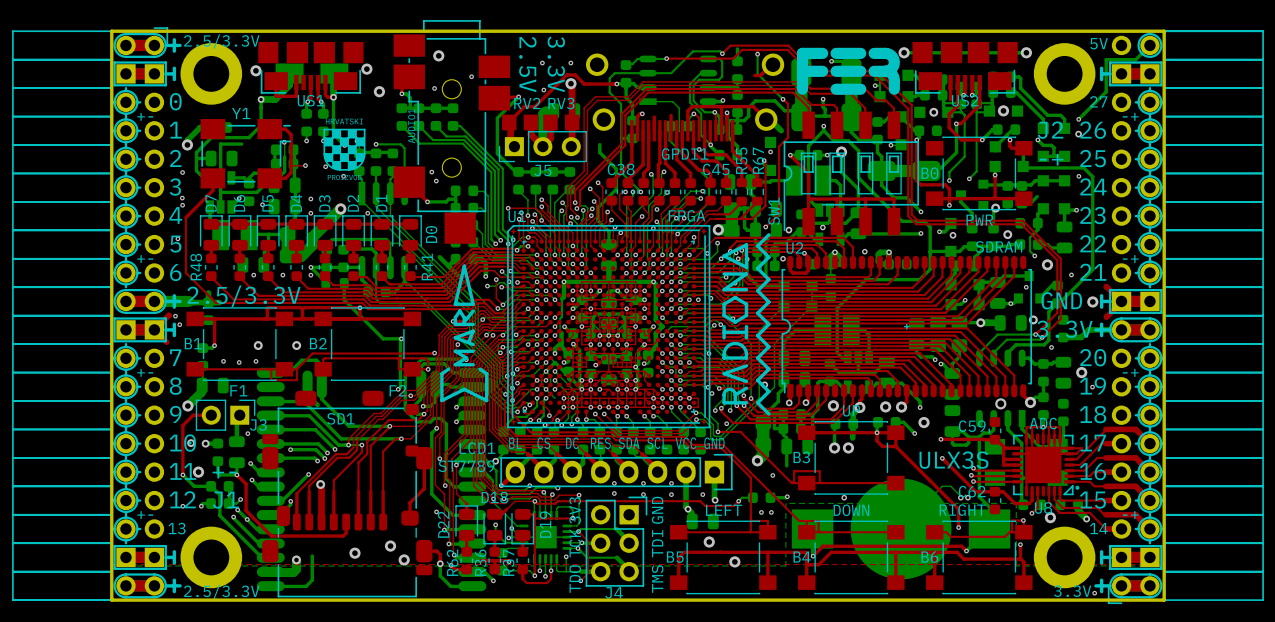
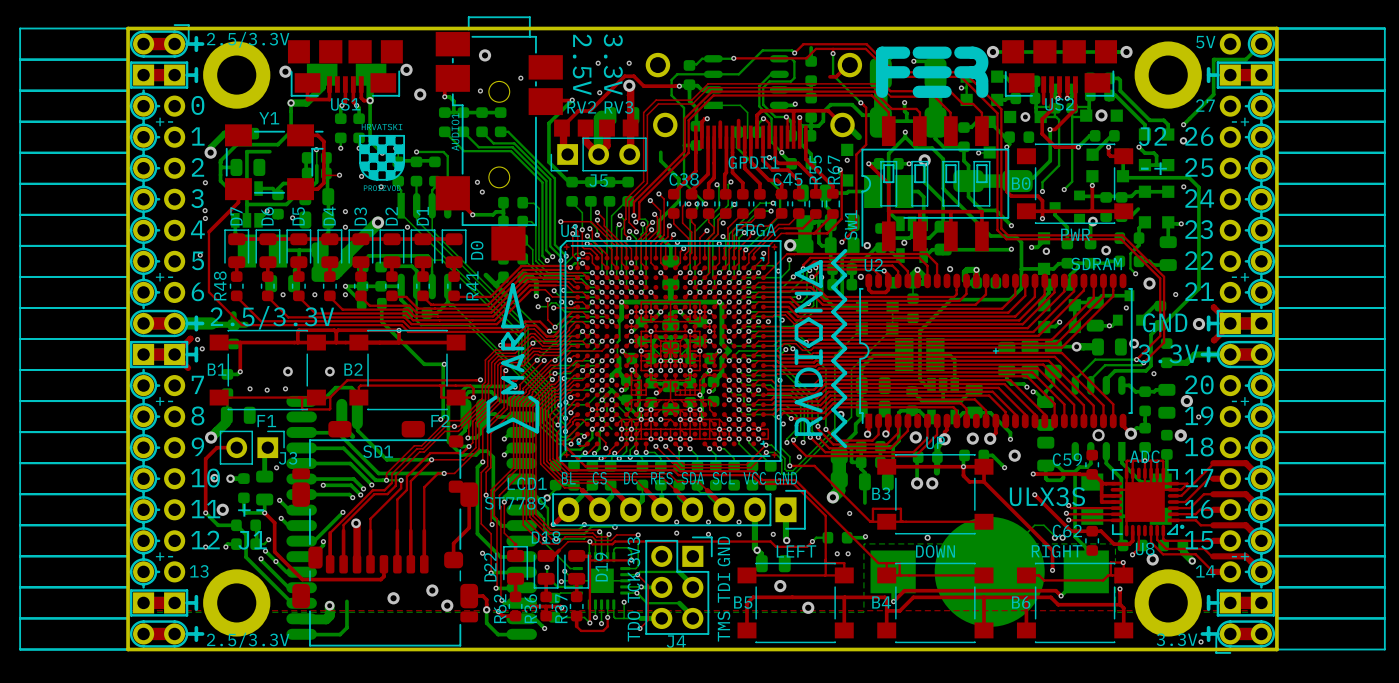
via: none -> (1180, 435)

